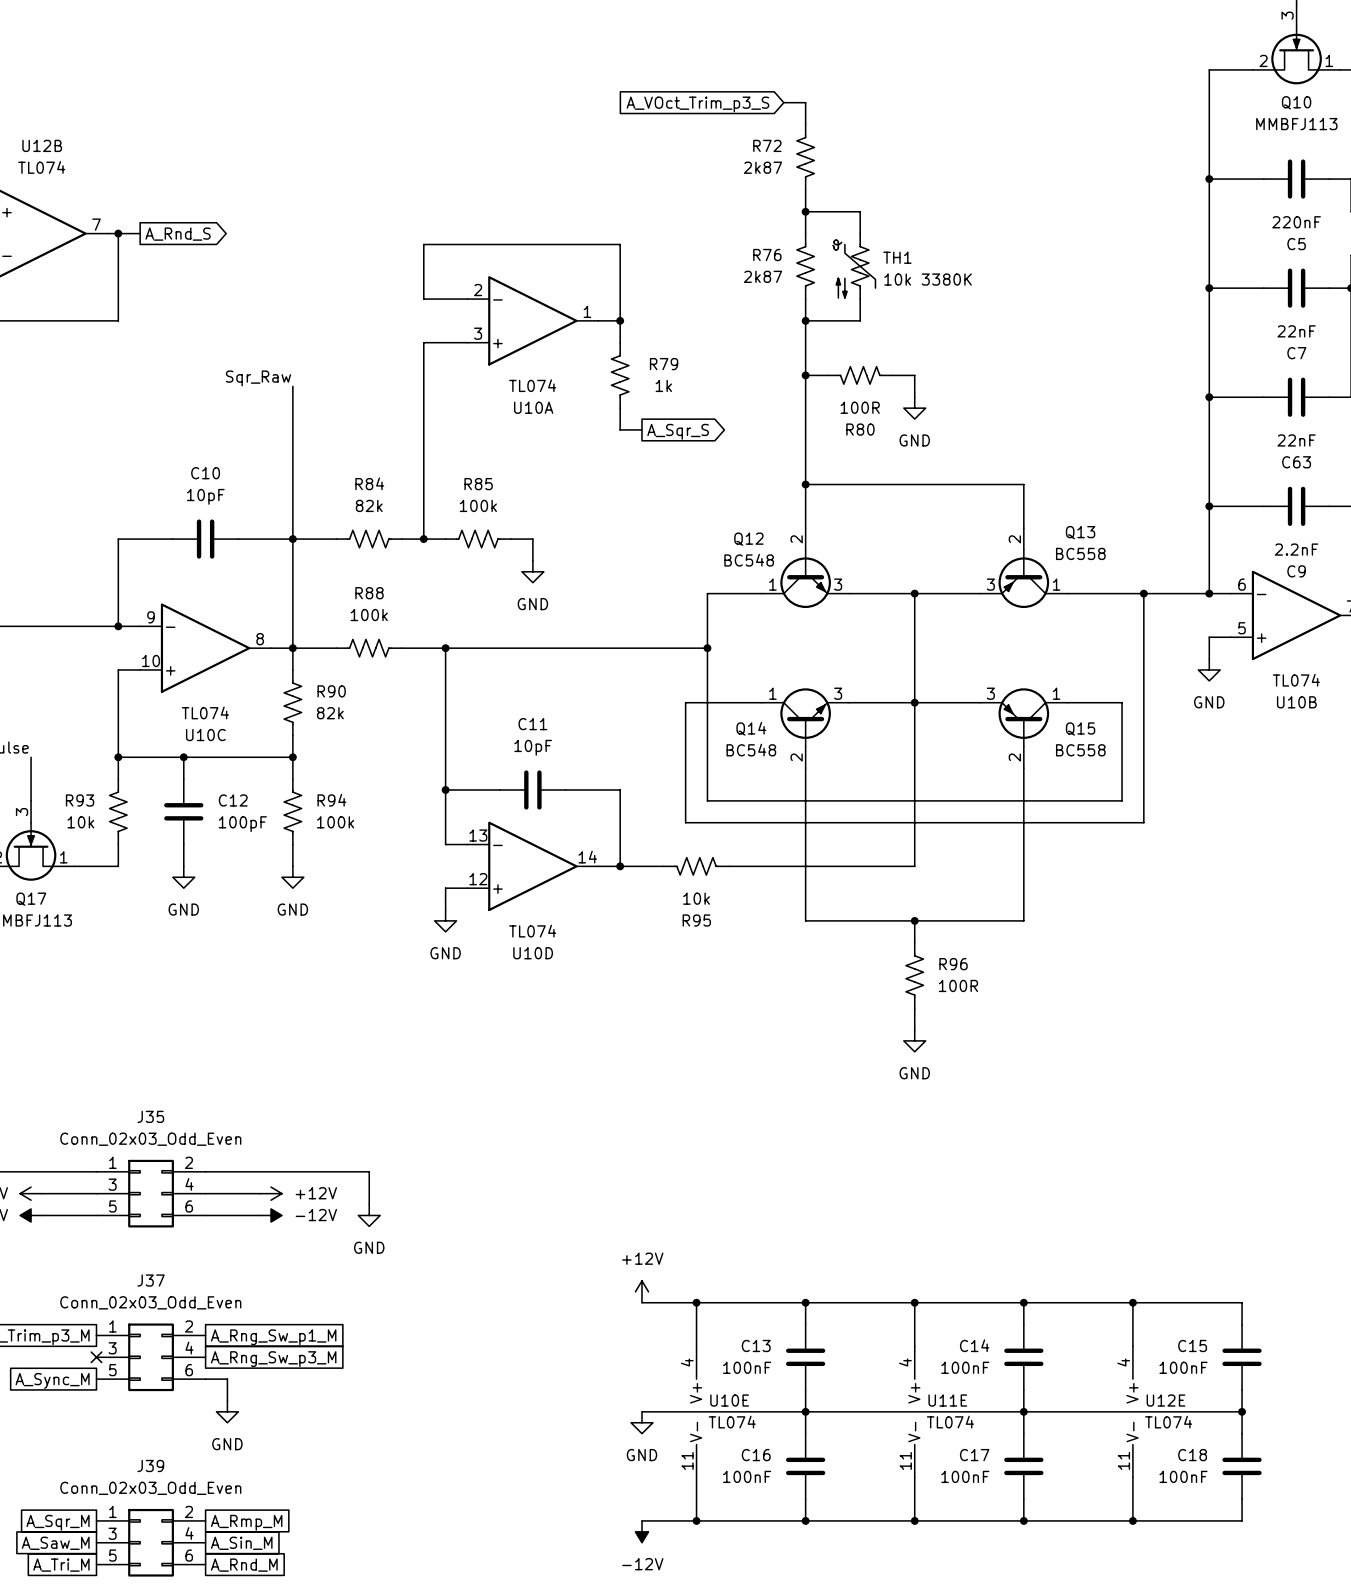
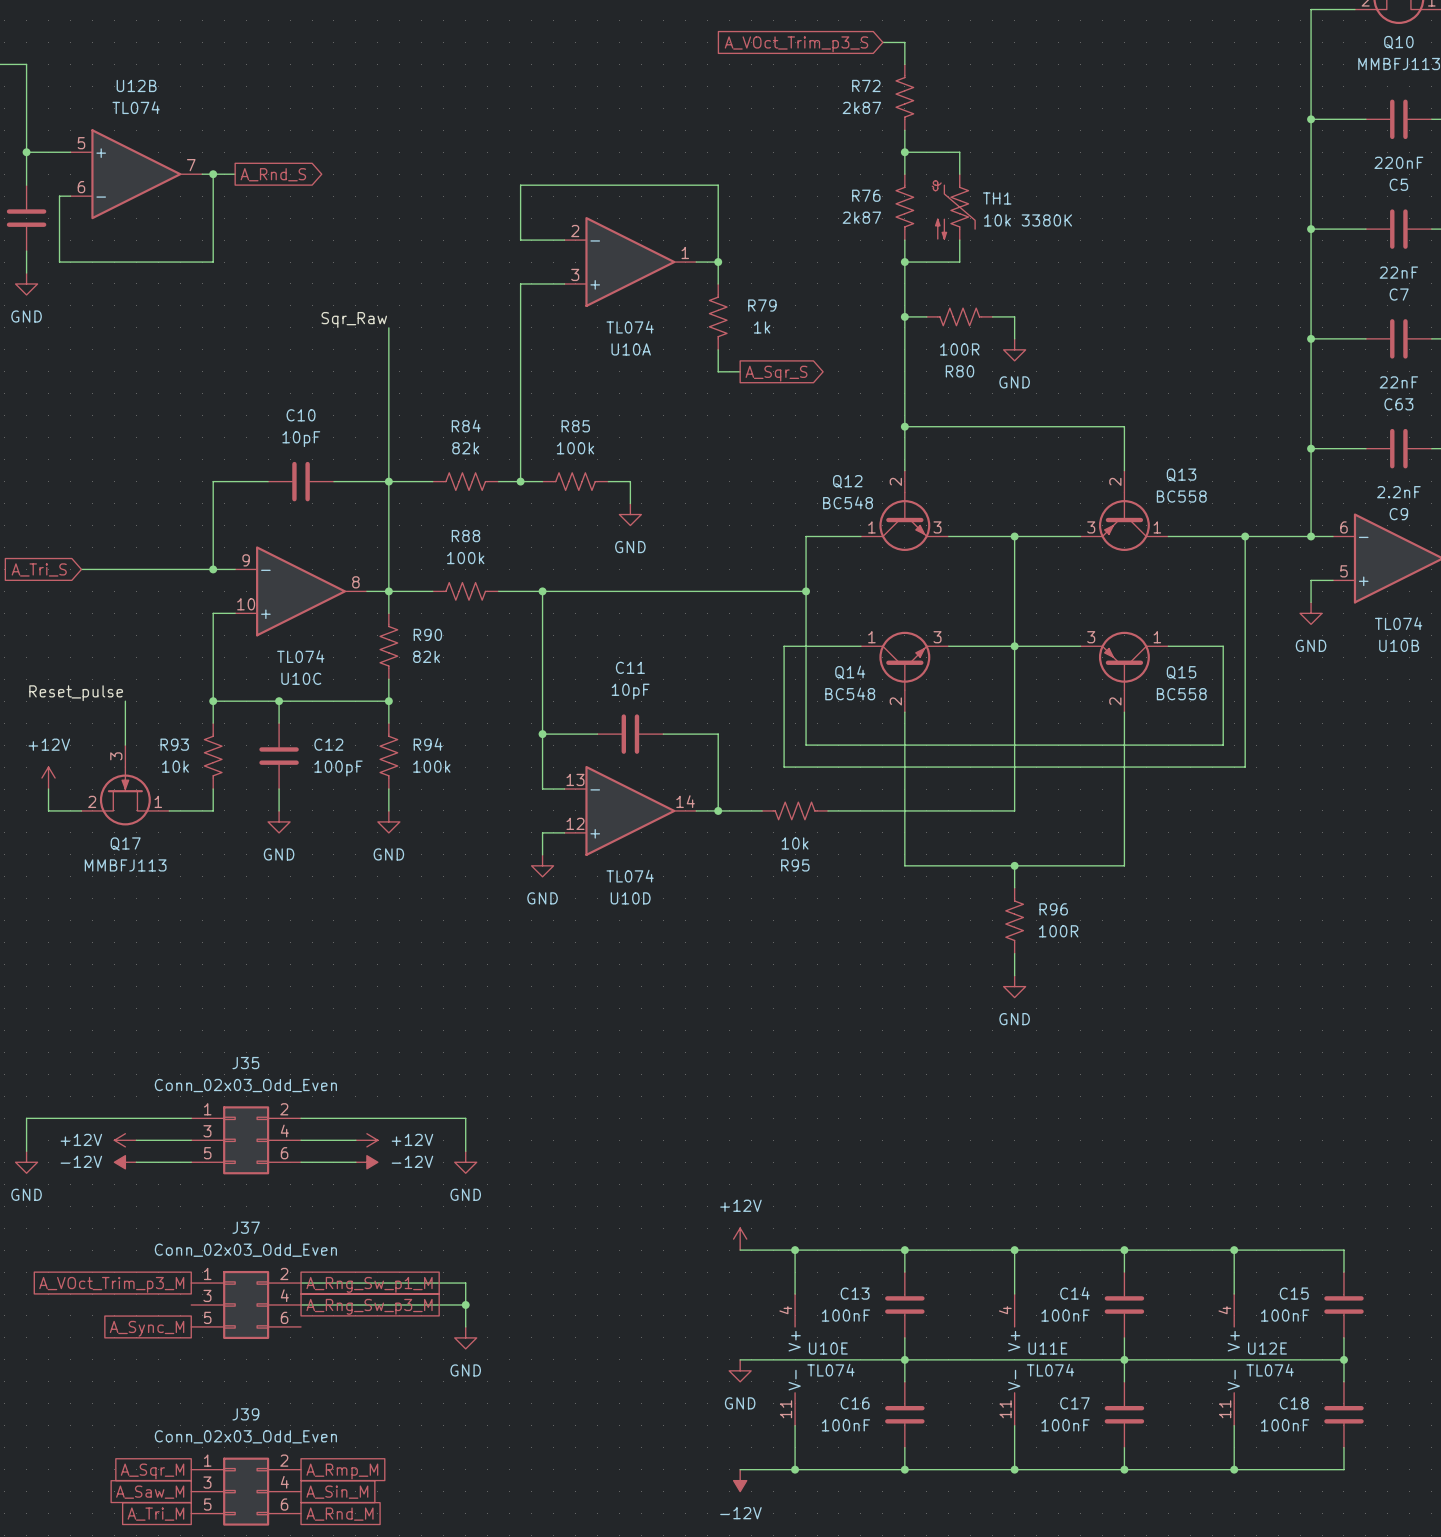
wire: none -> (301, 1283) (465, 1283) (465, 1326)
no-connect mark: (96, 1357) -> none
wire: none -> (301, 1304) (465, 1304)
junction: none -> (465, 1304)
wire: (205, 1379) (227, 1379) (227, 1400) -> none
power symbol position: GND (227, 1411) -> GND (465, 1337)

